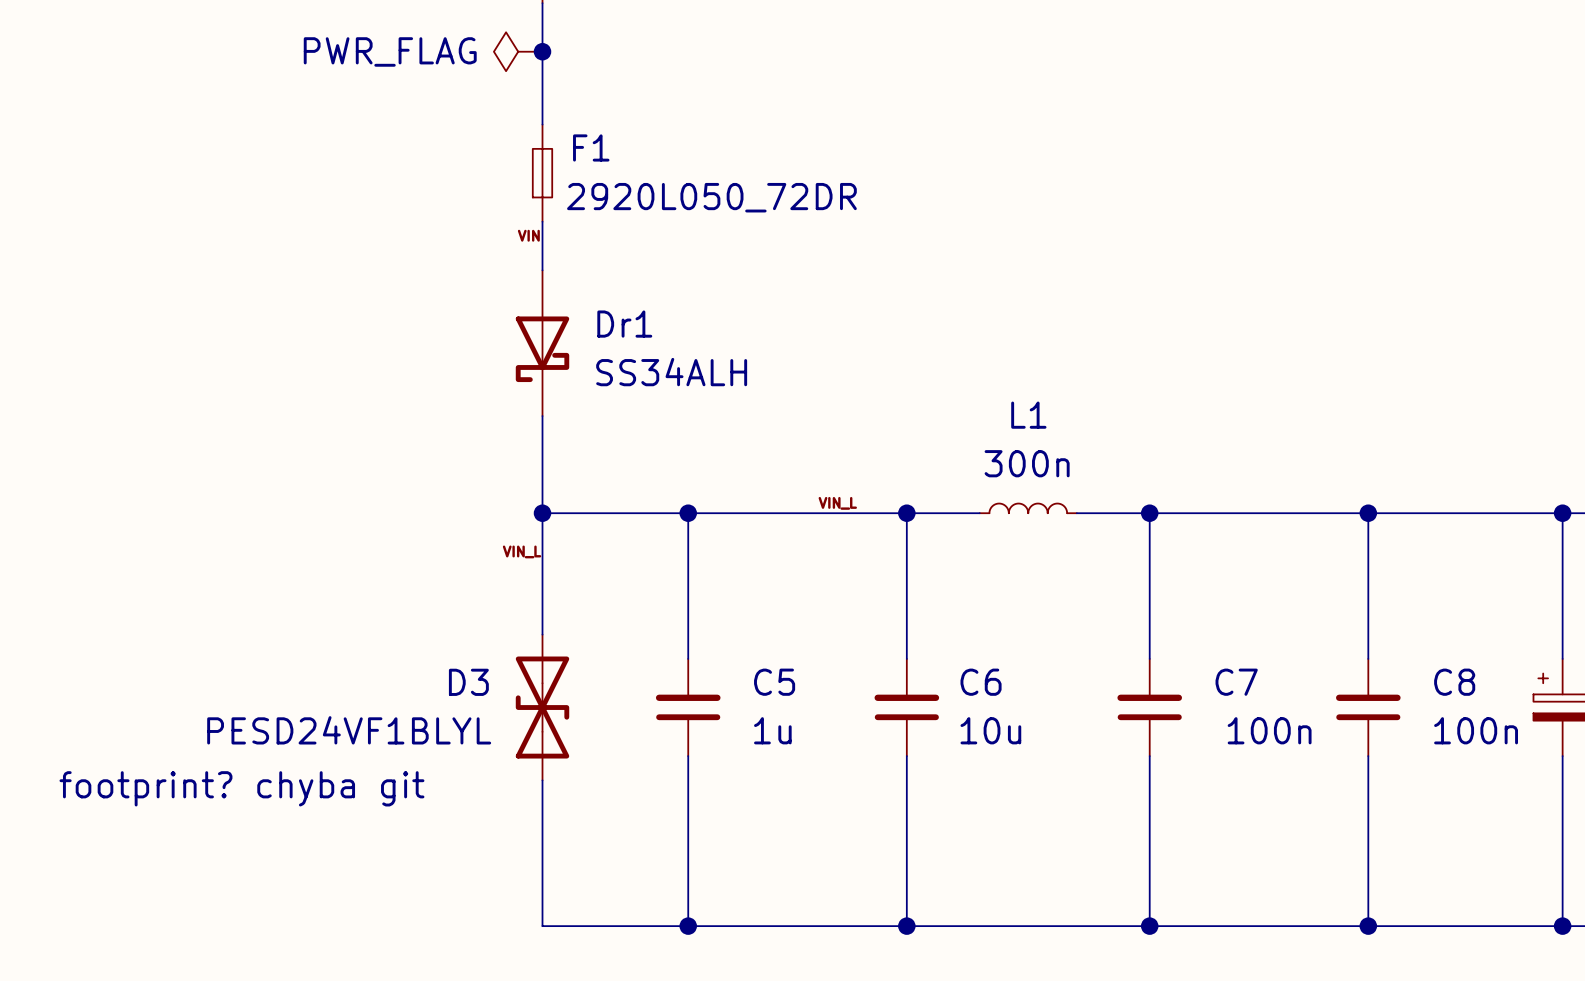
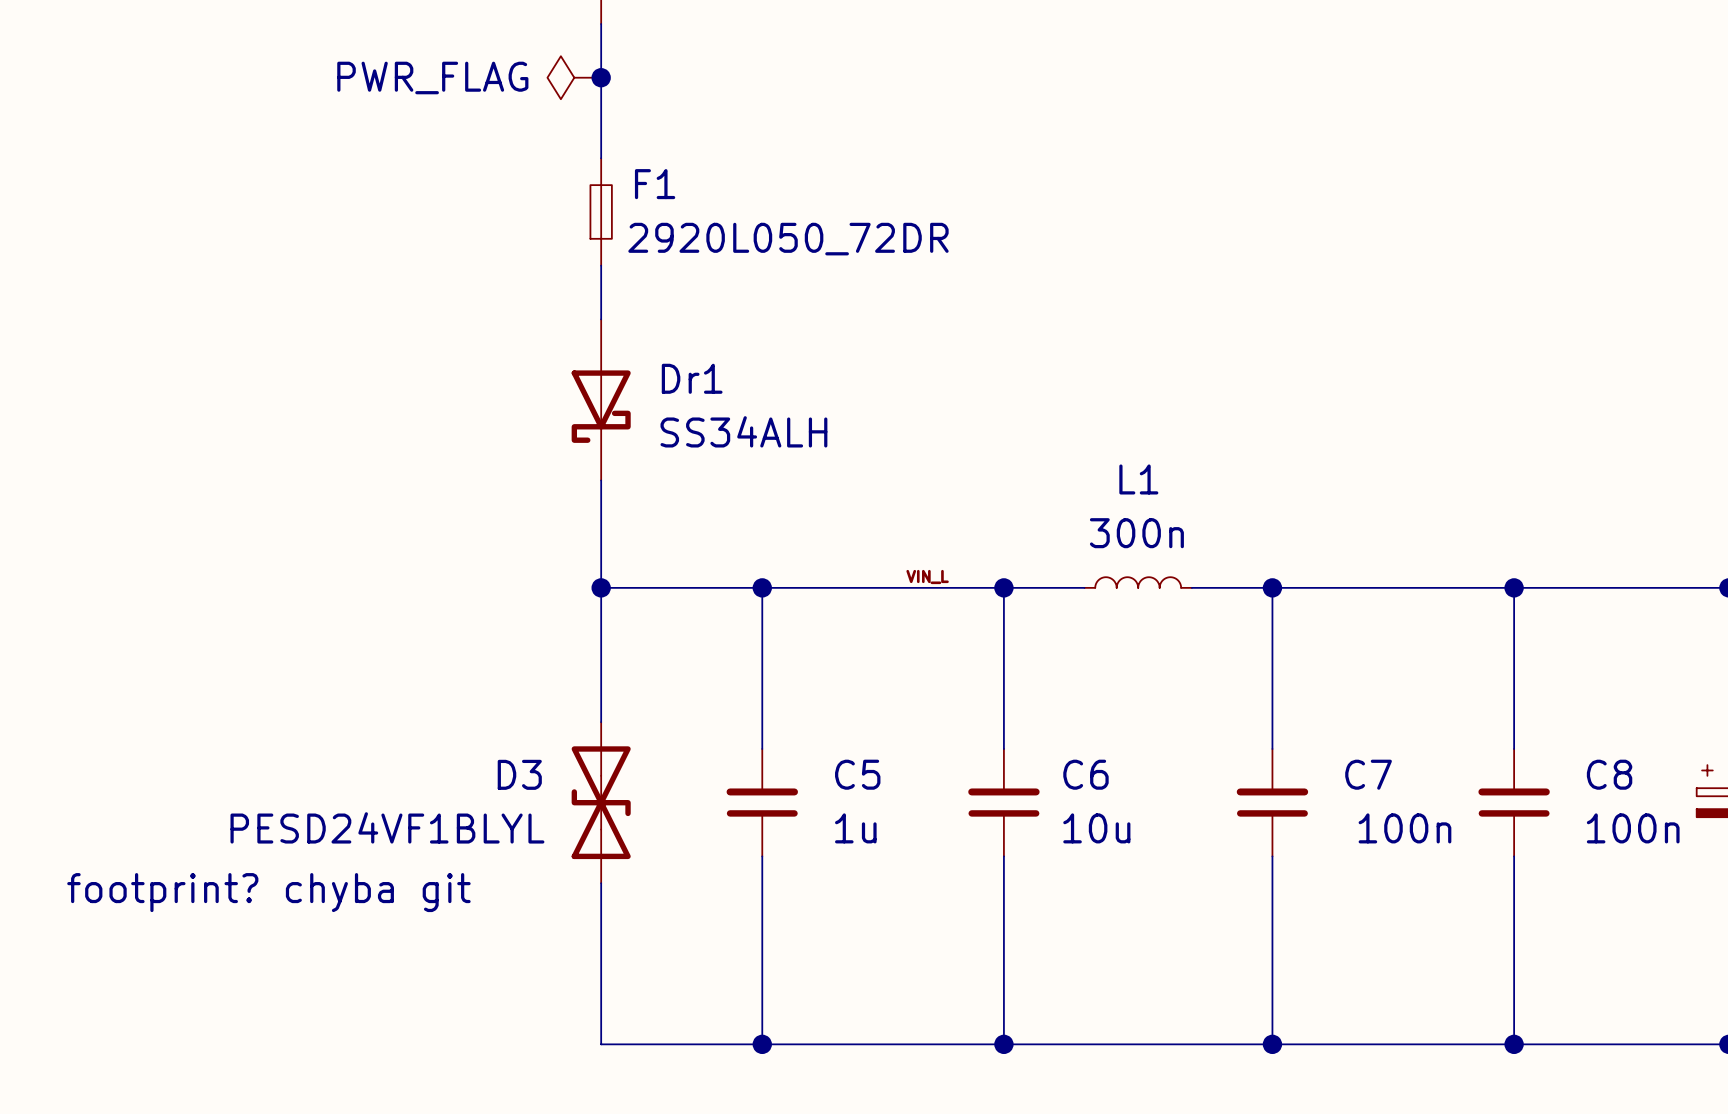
label: VIN (528, 235) -> none
label: VIN_L (522, 551) -> none

